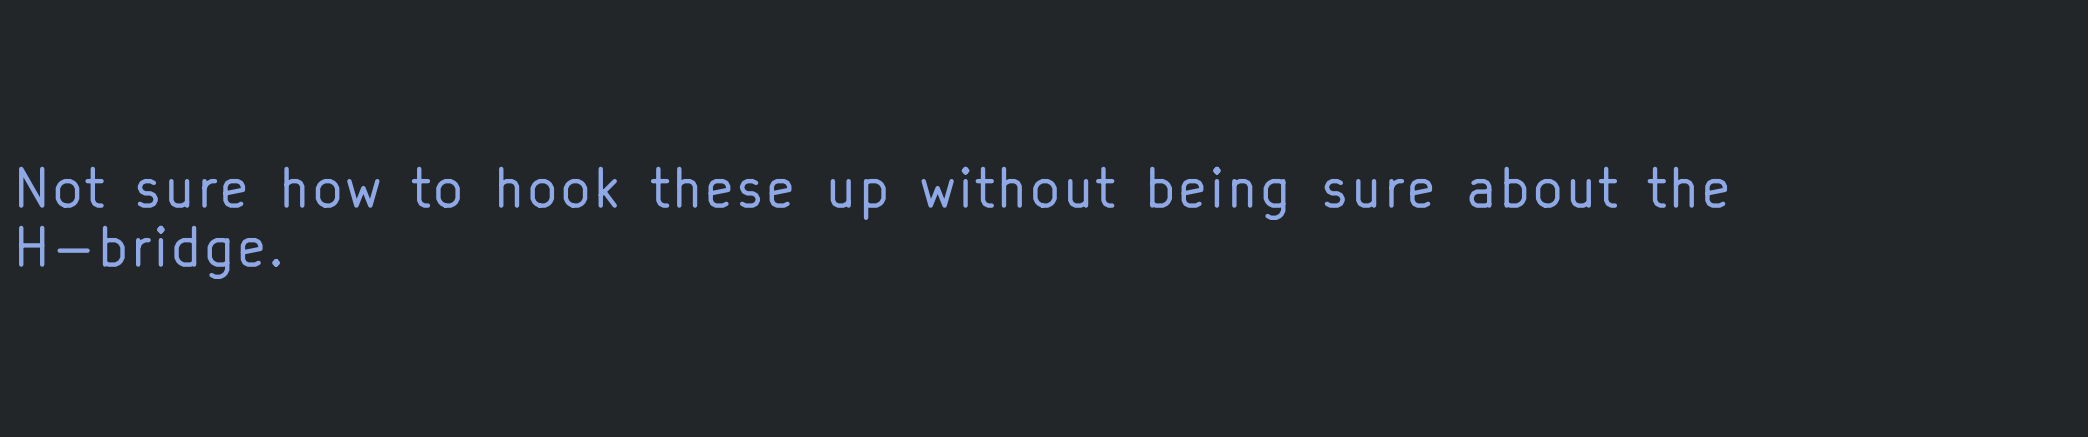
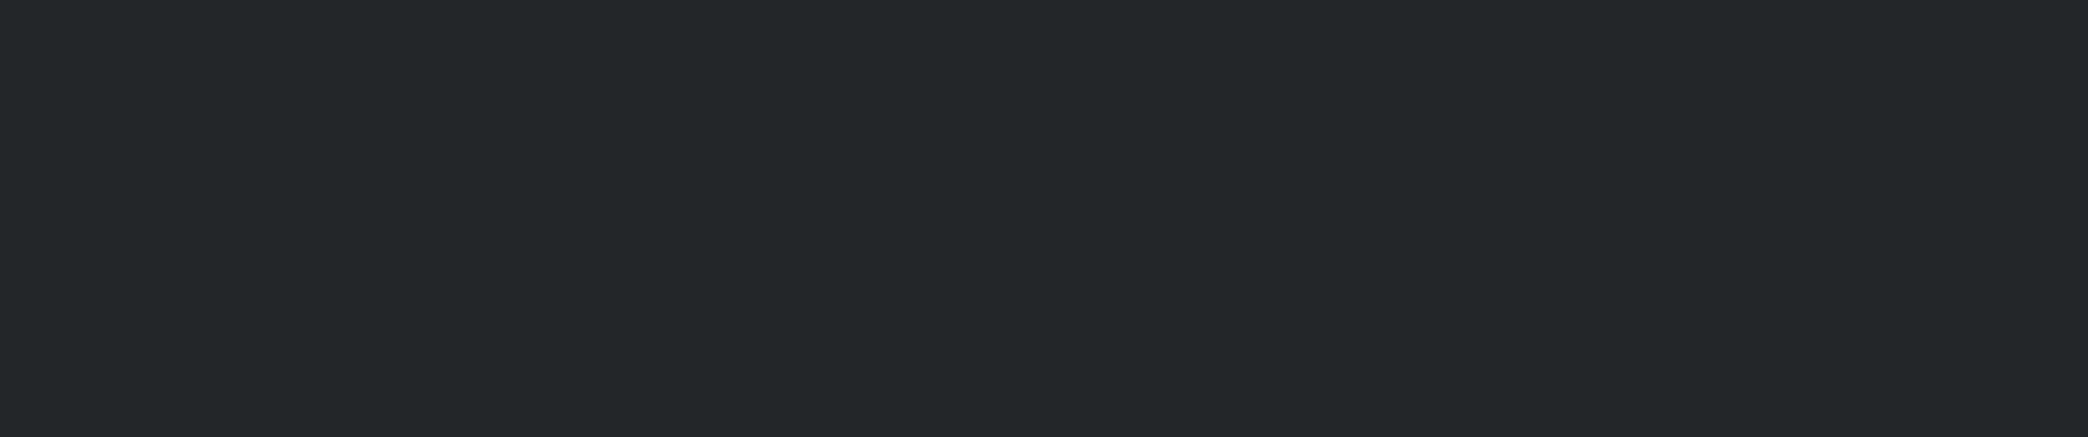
text: Not sure how to hook these up without being sure about the (873, 193) -> none
text: H-bridge. (149, 252) -> none

